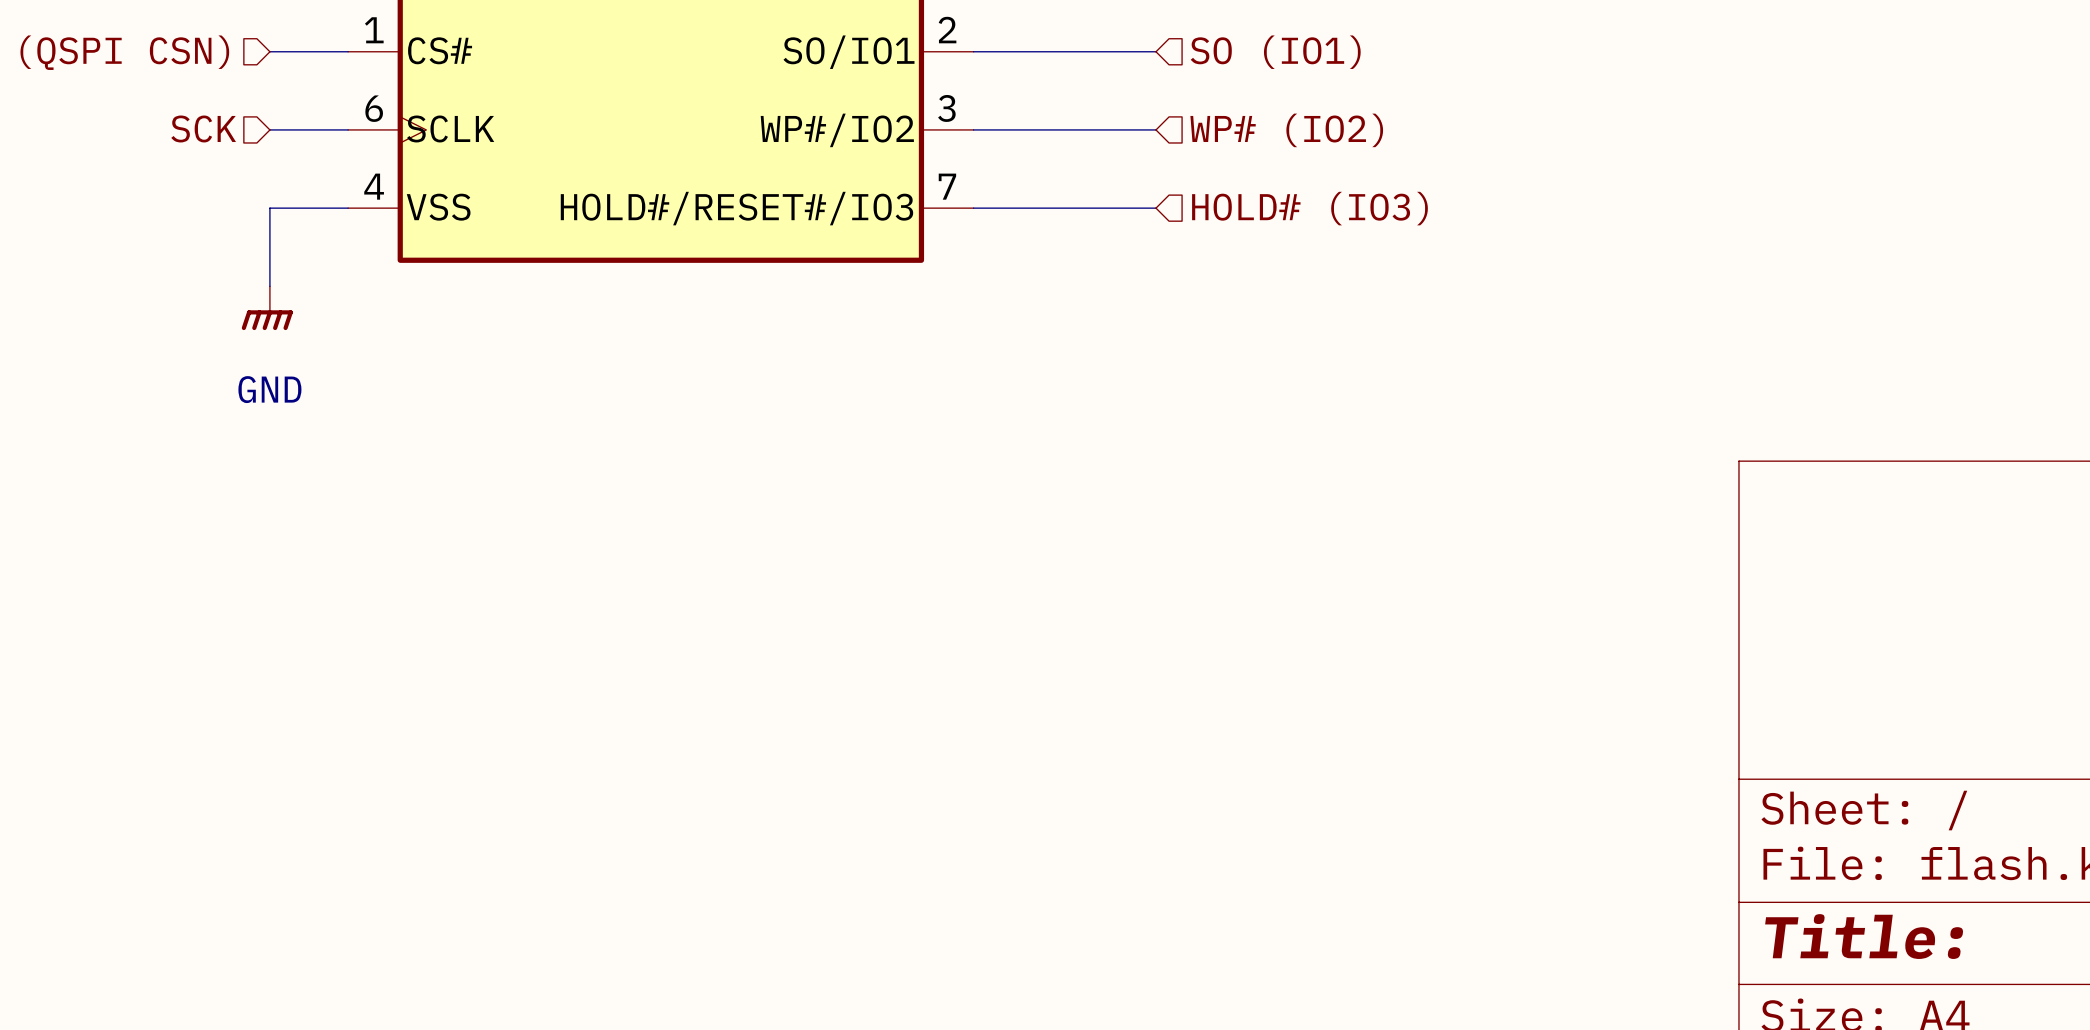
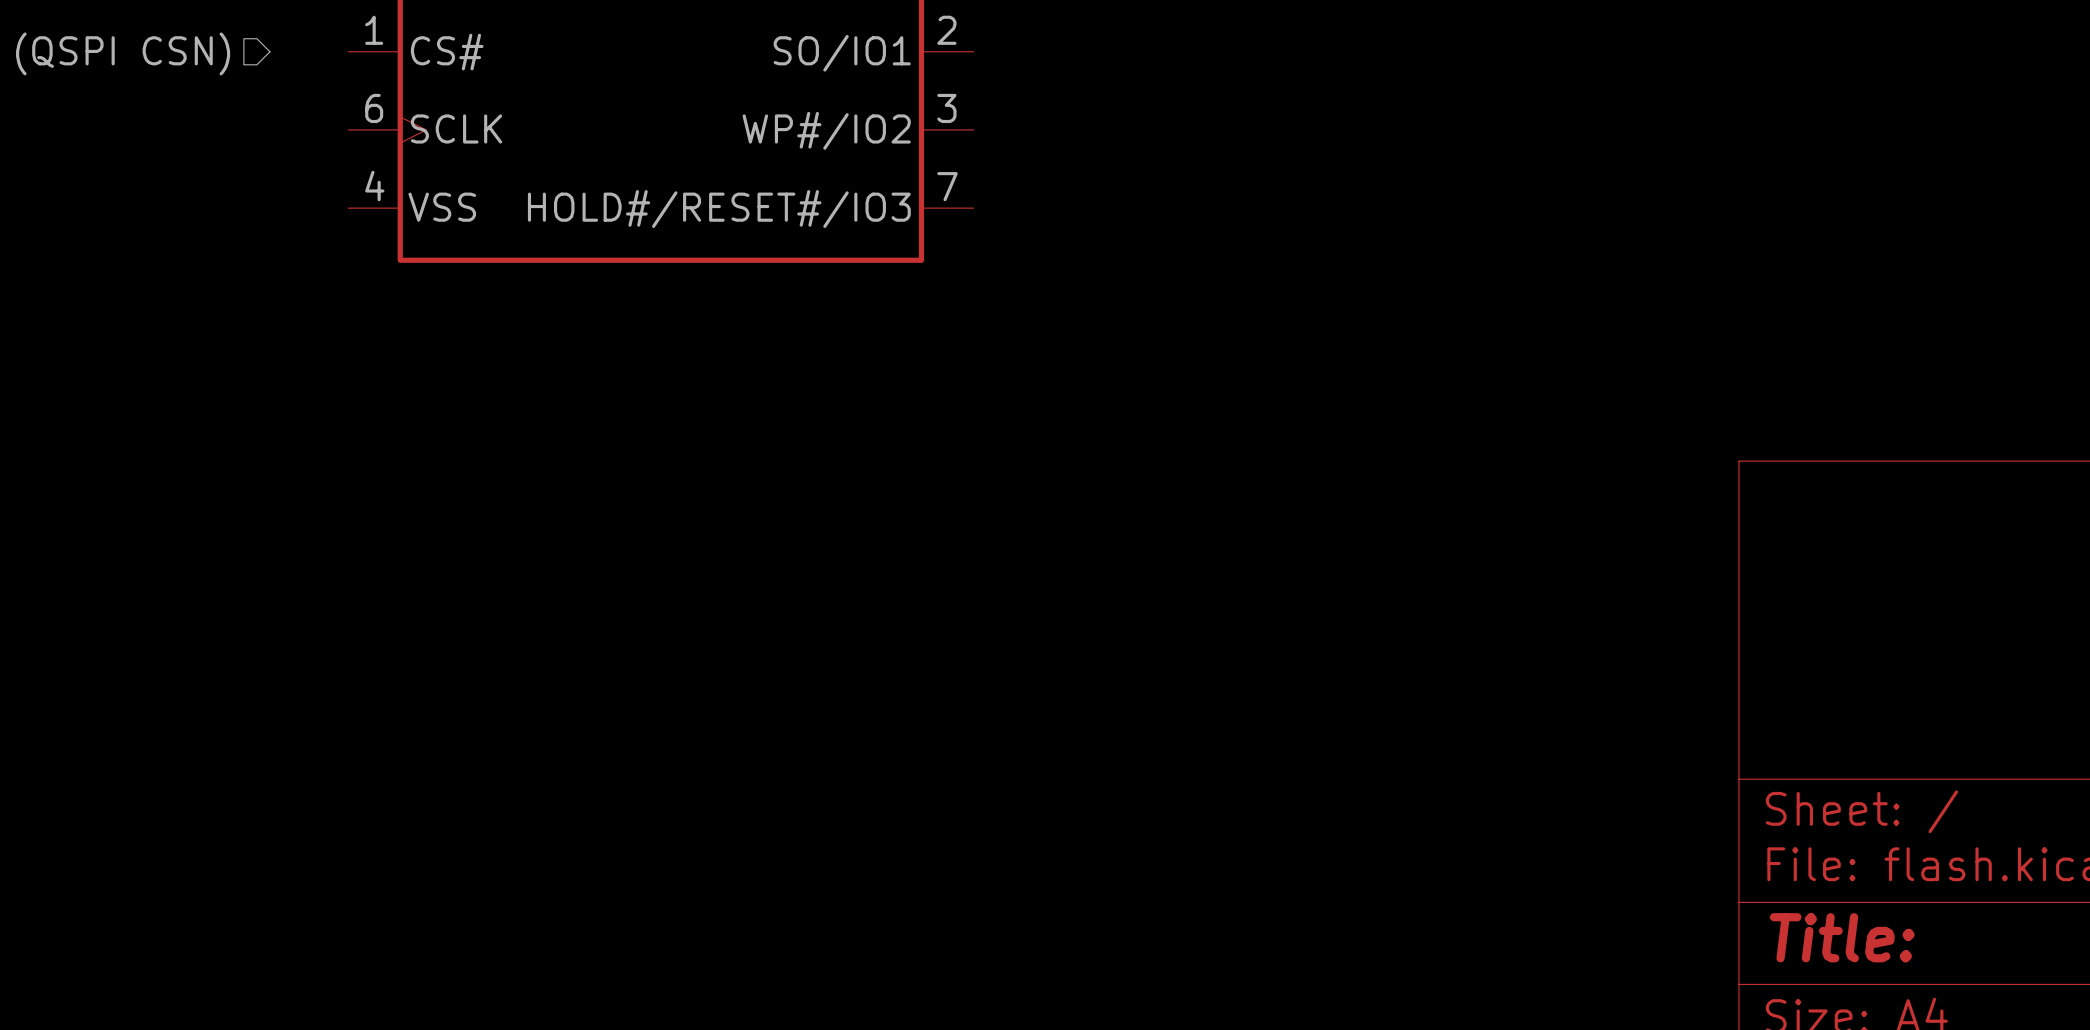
wire: (269, 51) (348, 51) -> none
wire: (973, 51) (1156, 51) -> none
hierarchical label: SO (IO1) (1275, 52) -> none
hierarchical label: SCK (203, 128) -> none
wire: (269, 129) (348, 129) -> none
wire: (973, 129) (1156, 129) -> none
hierarchical label: WP# (IO2) (1286, 130) -> none
wire: (348, 208) (269, 208) (269, 286) -> none
wire: (973, 208) (1156, 208) -> none
hierarchical label: HOLD# (IO3) (1309, 208) -> none
power symbol: GND (267, 308) -> none

